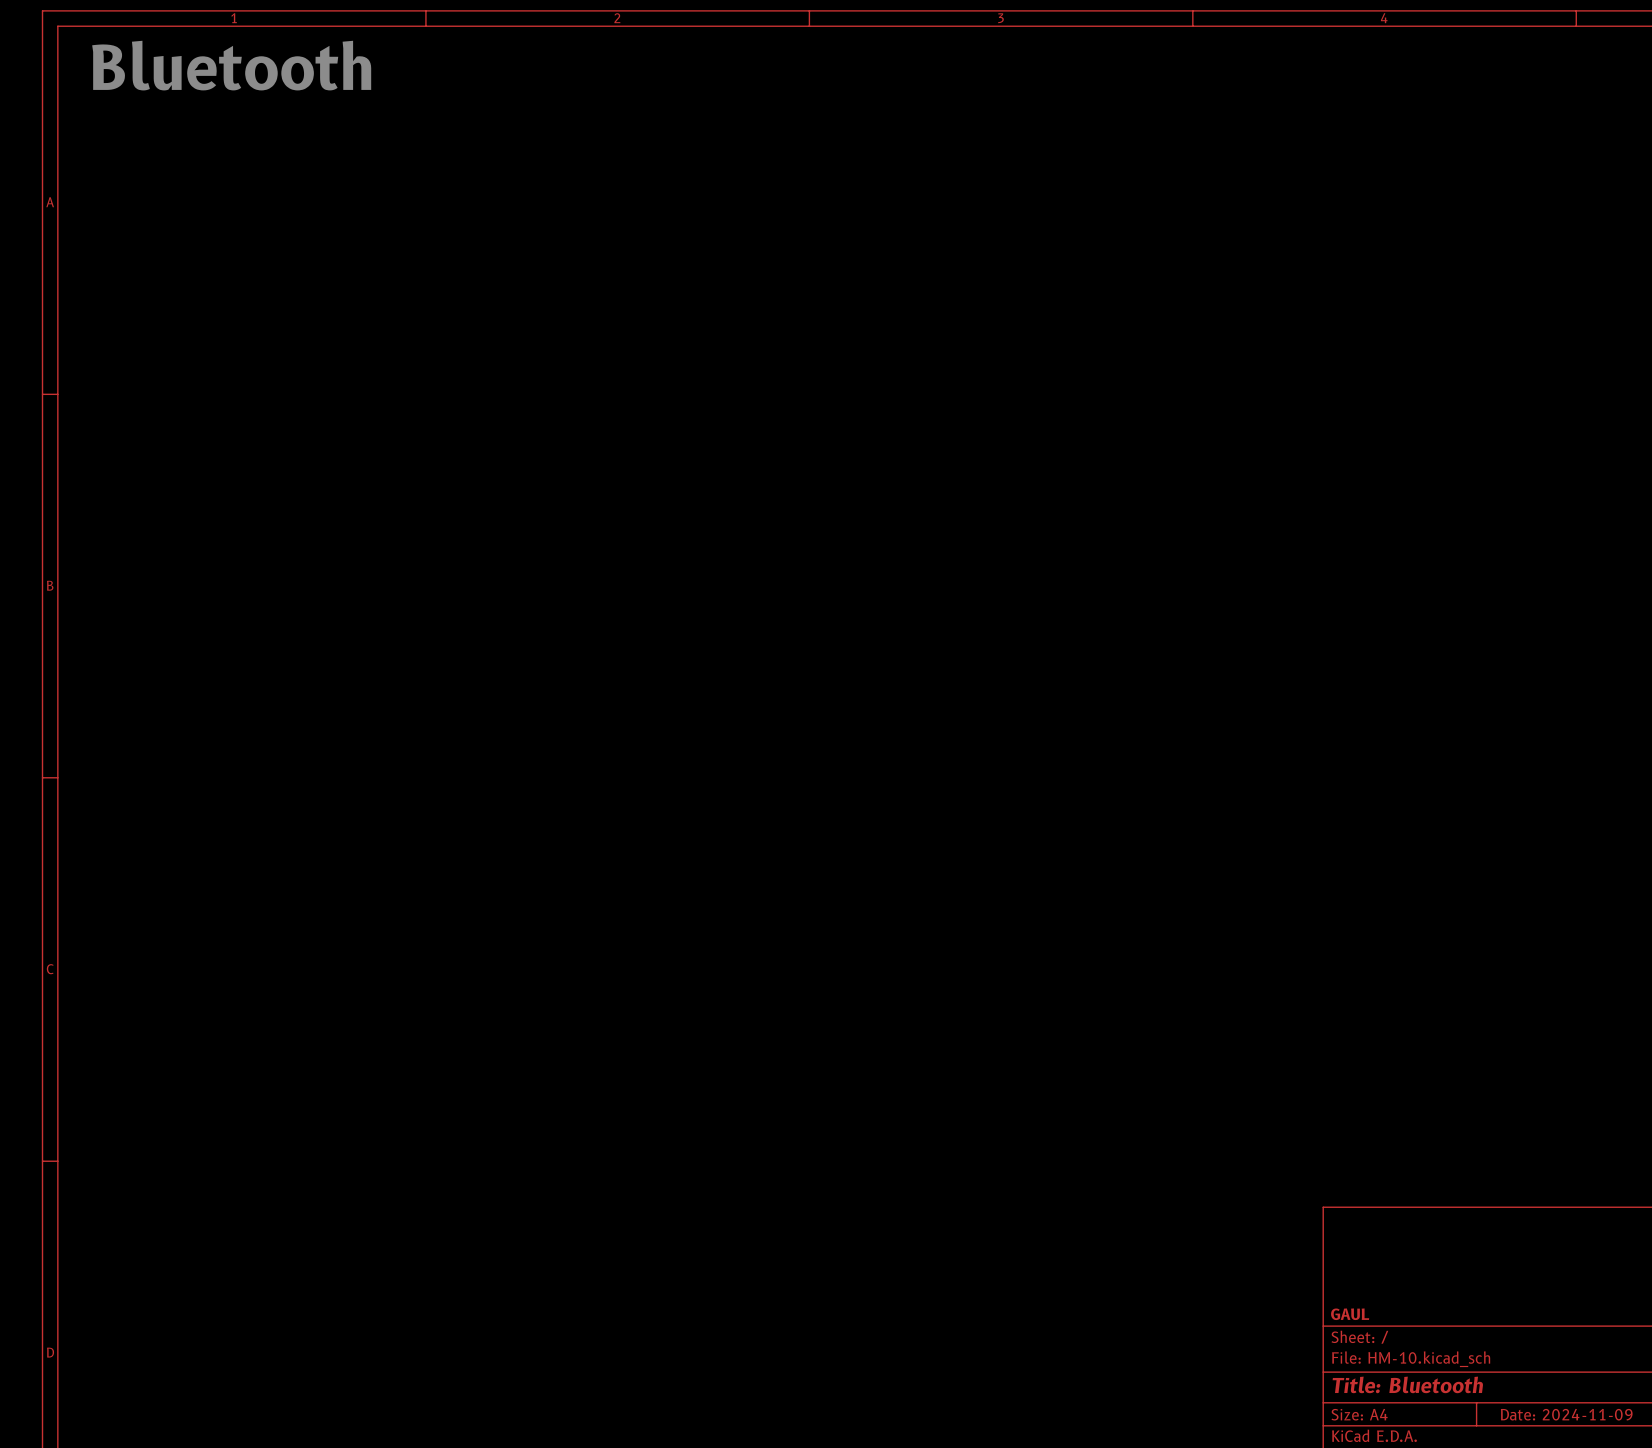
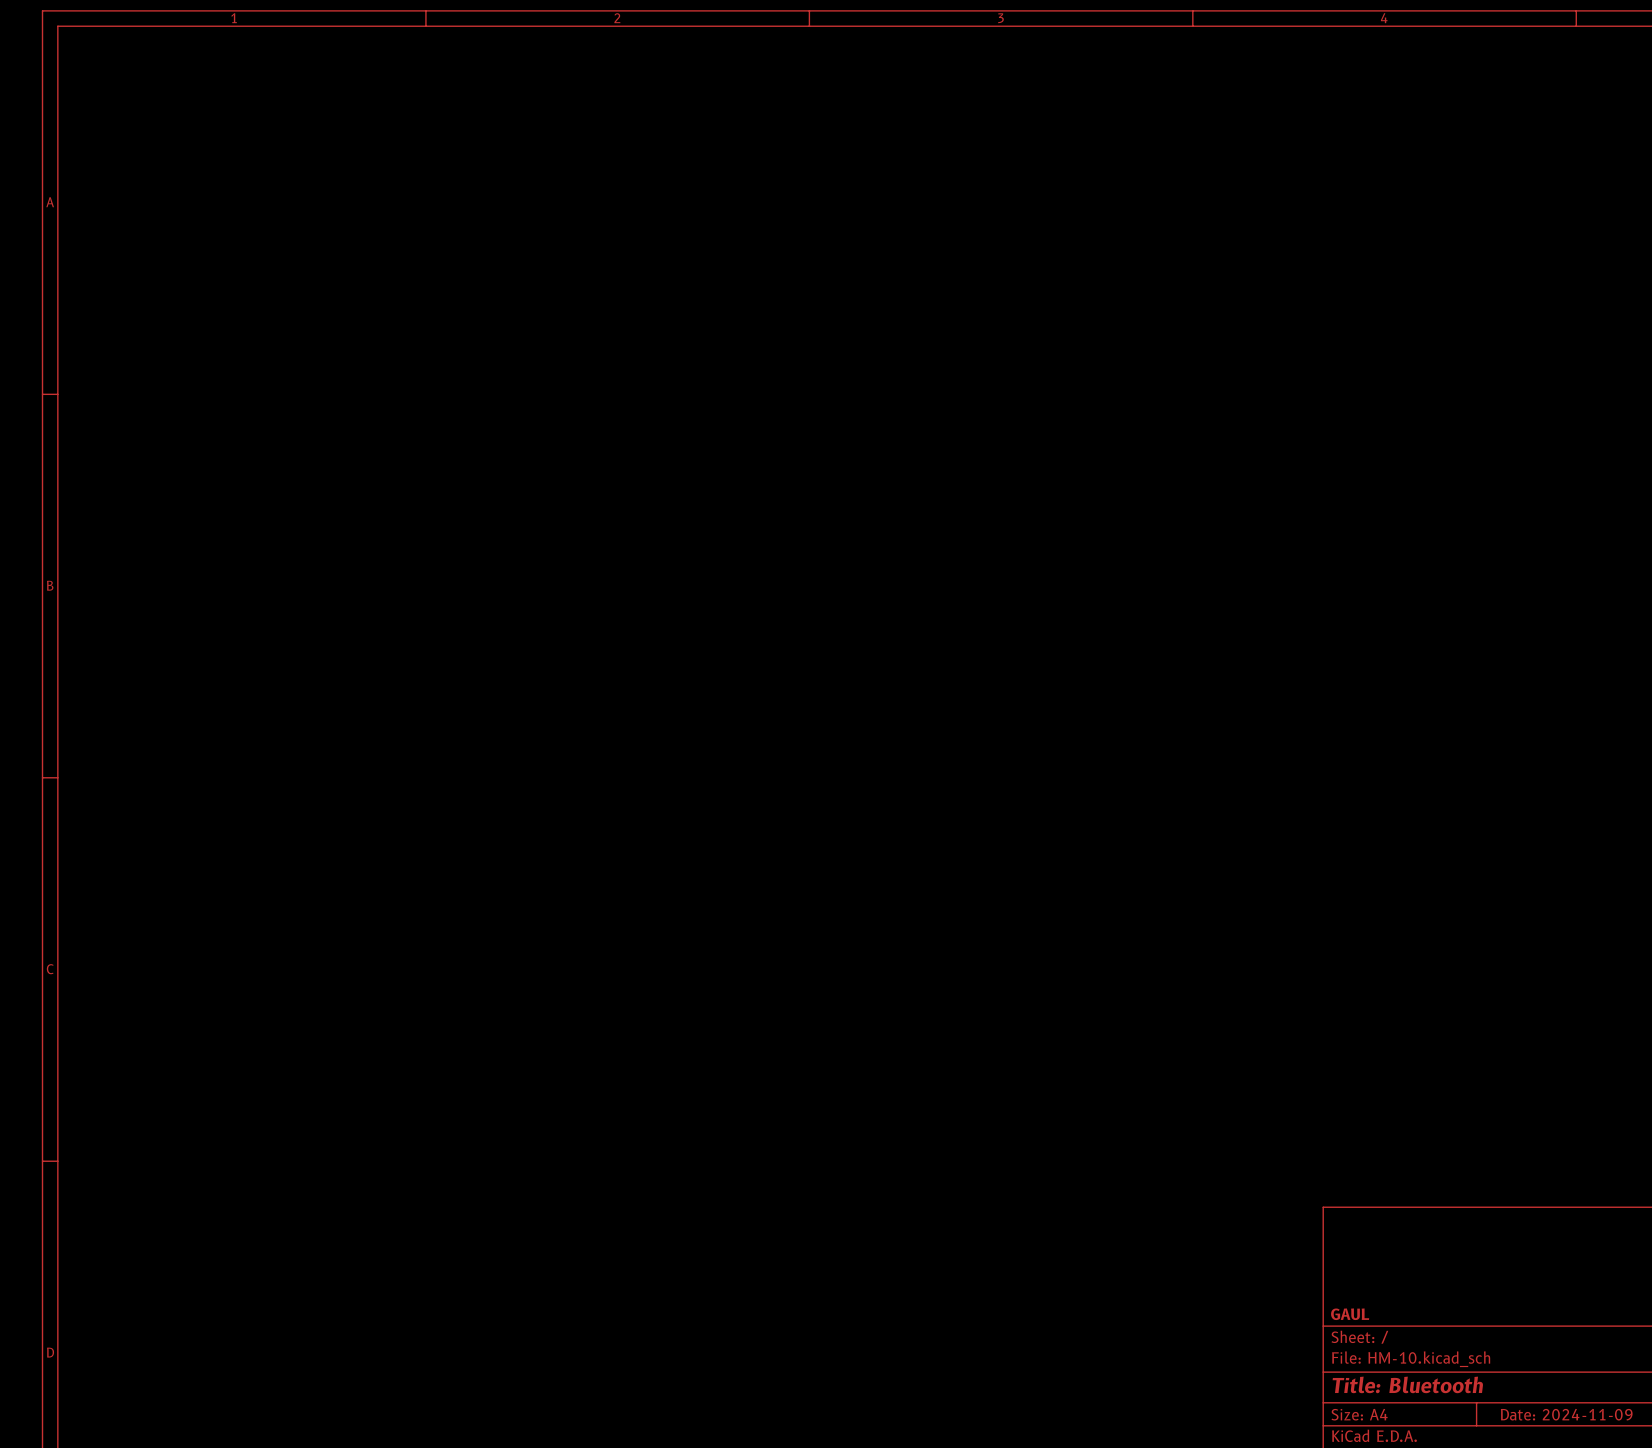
text: Bluetooth (231, 65) -> none

